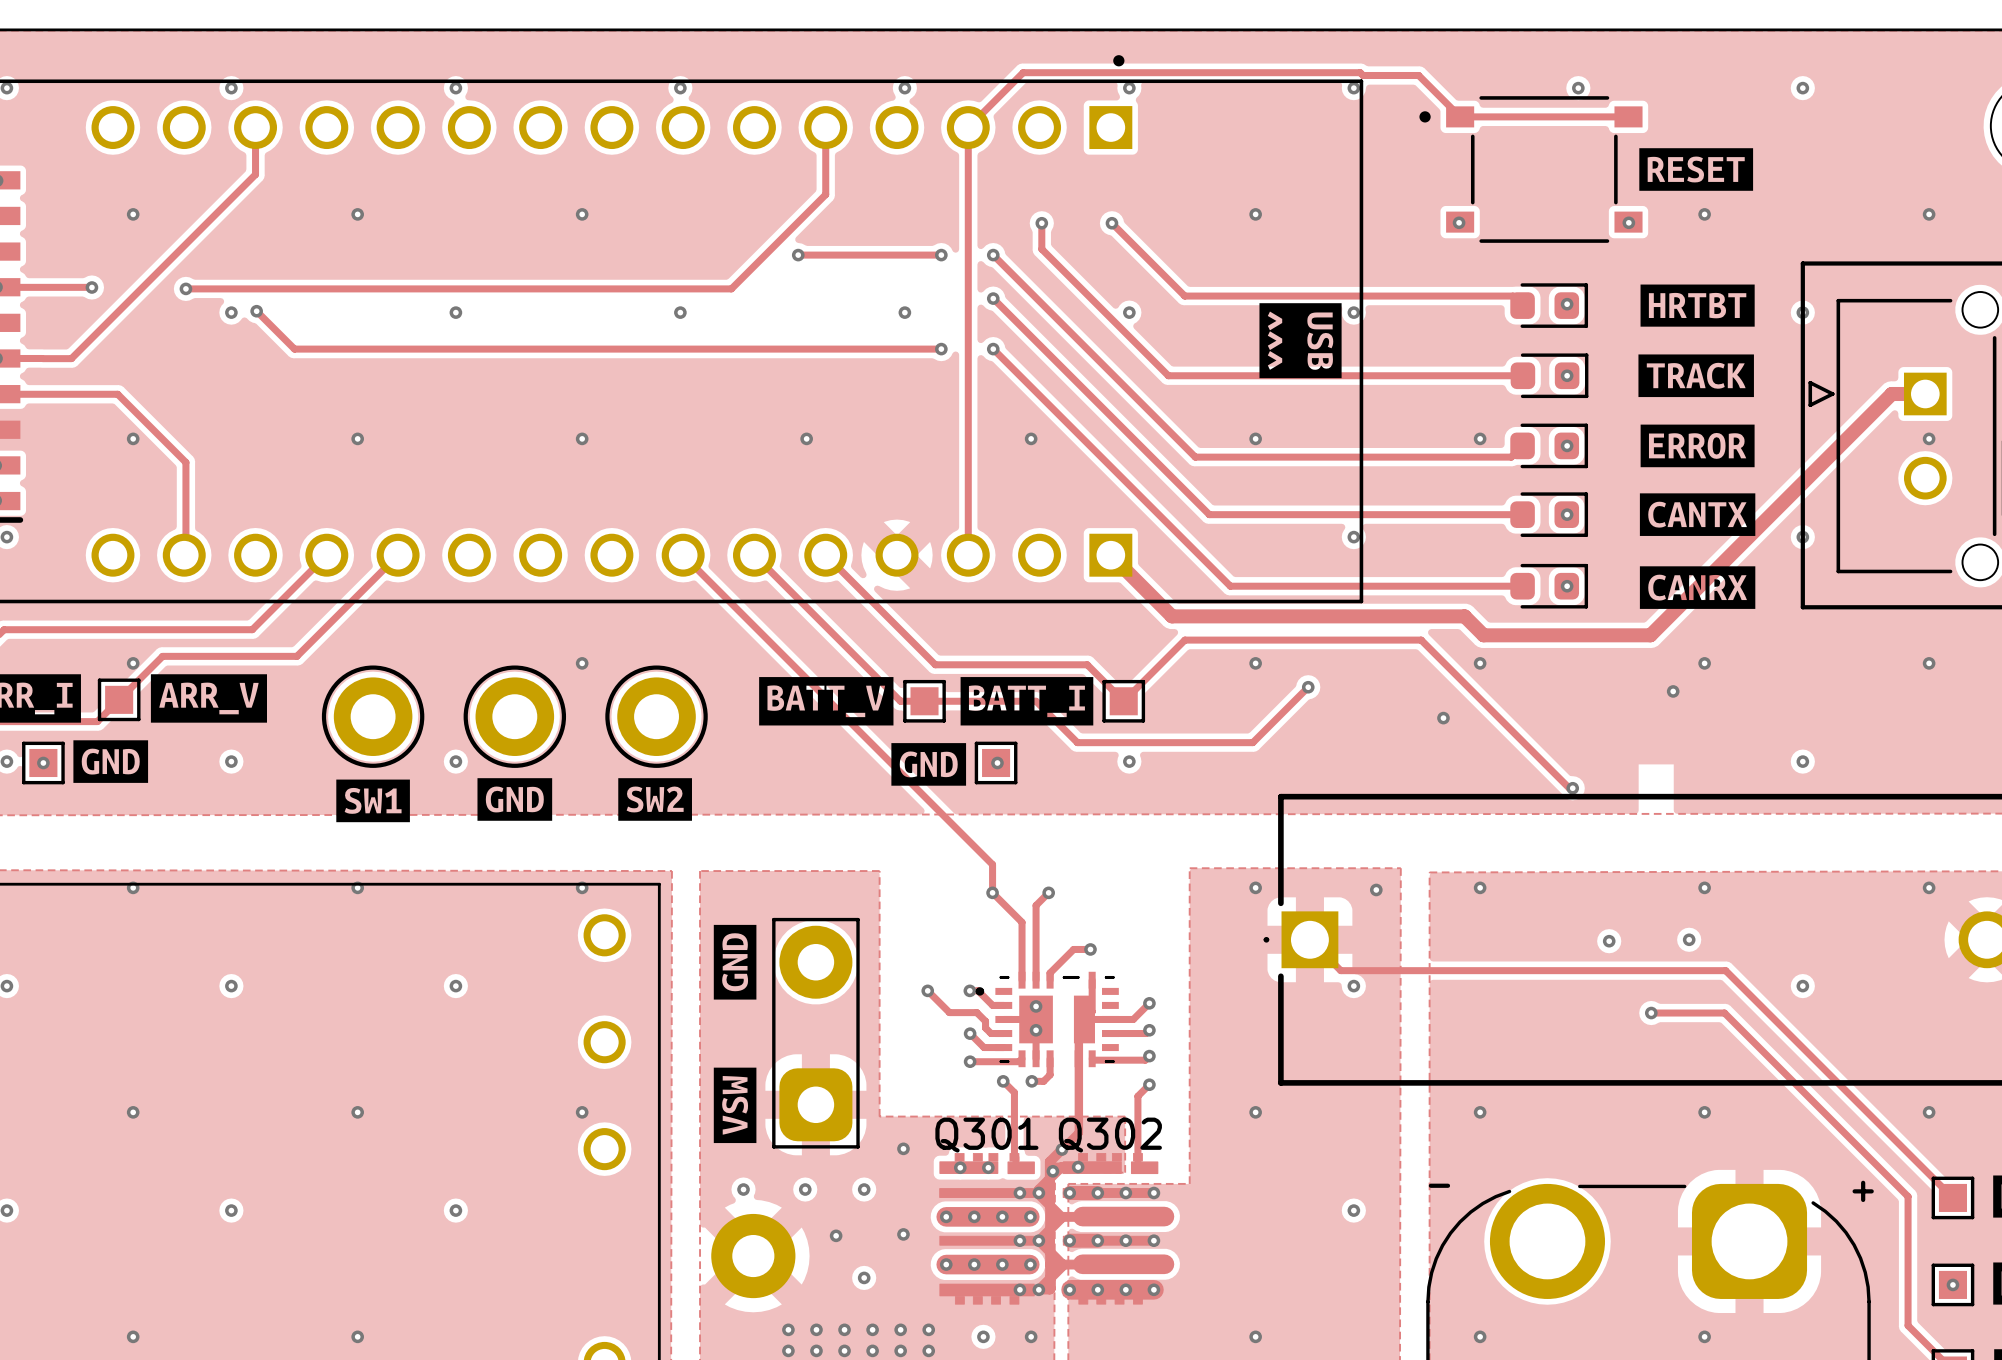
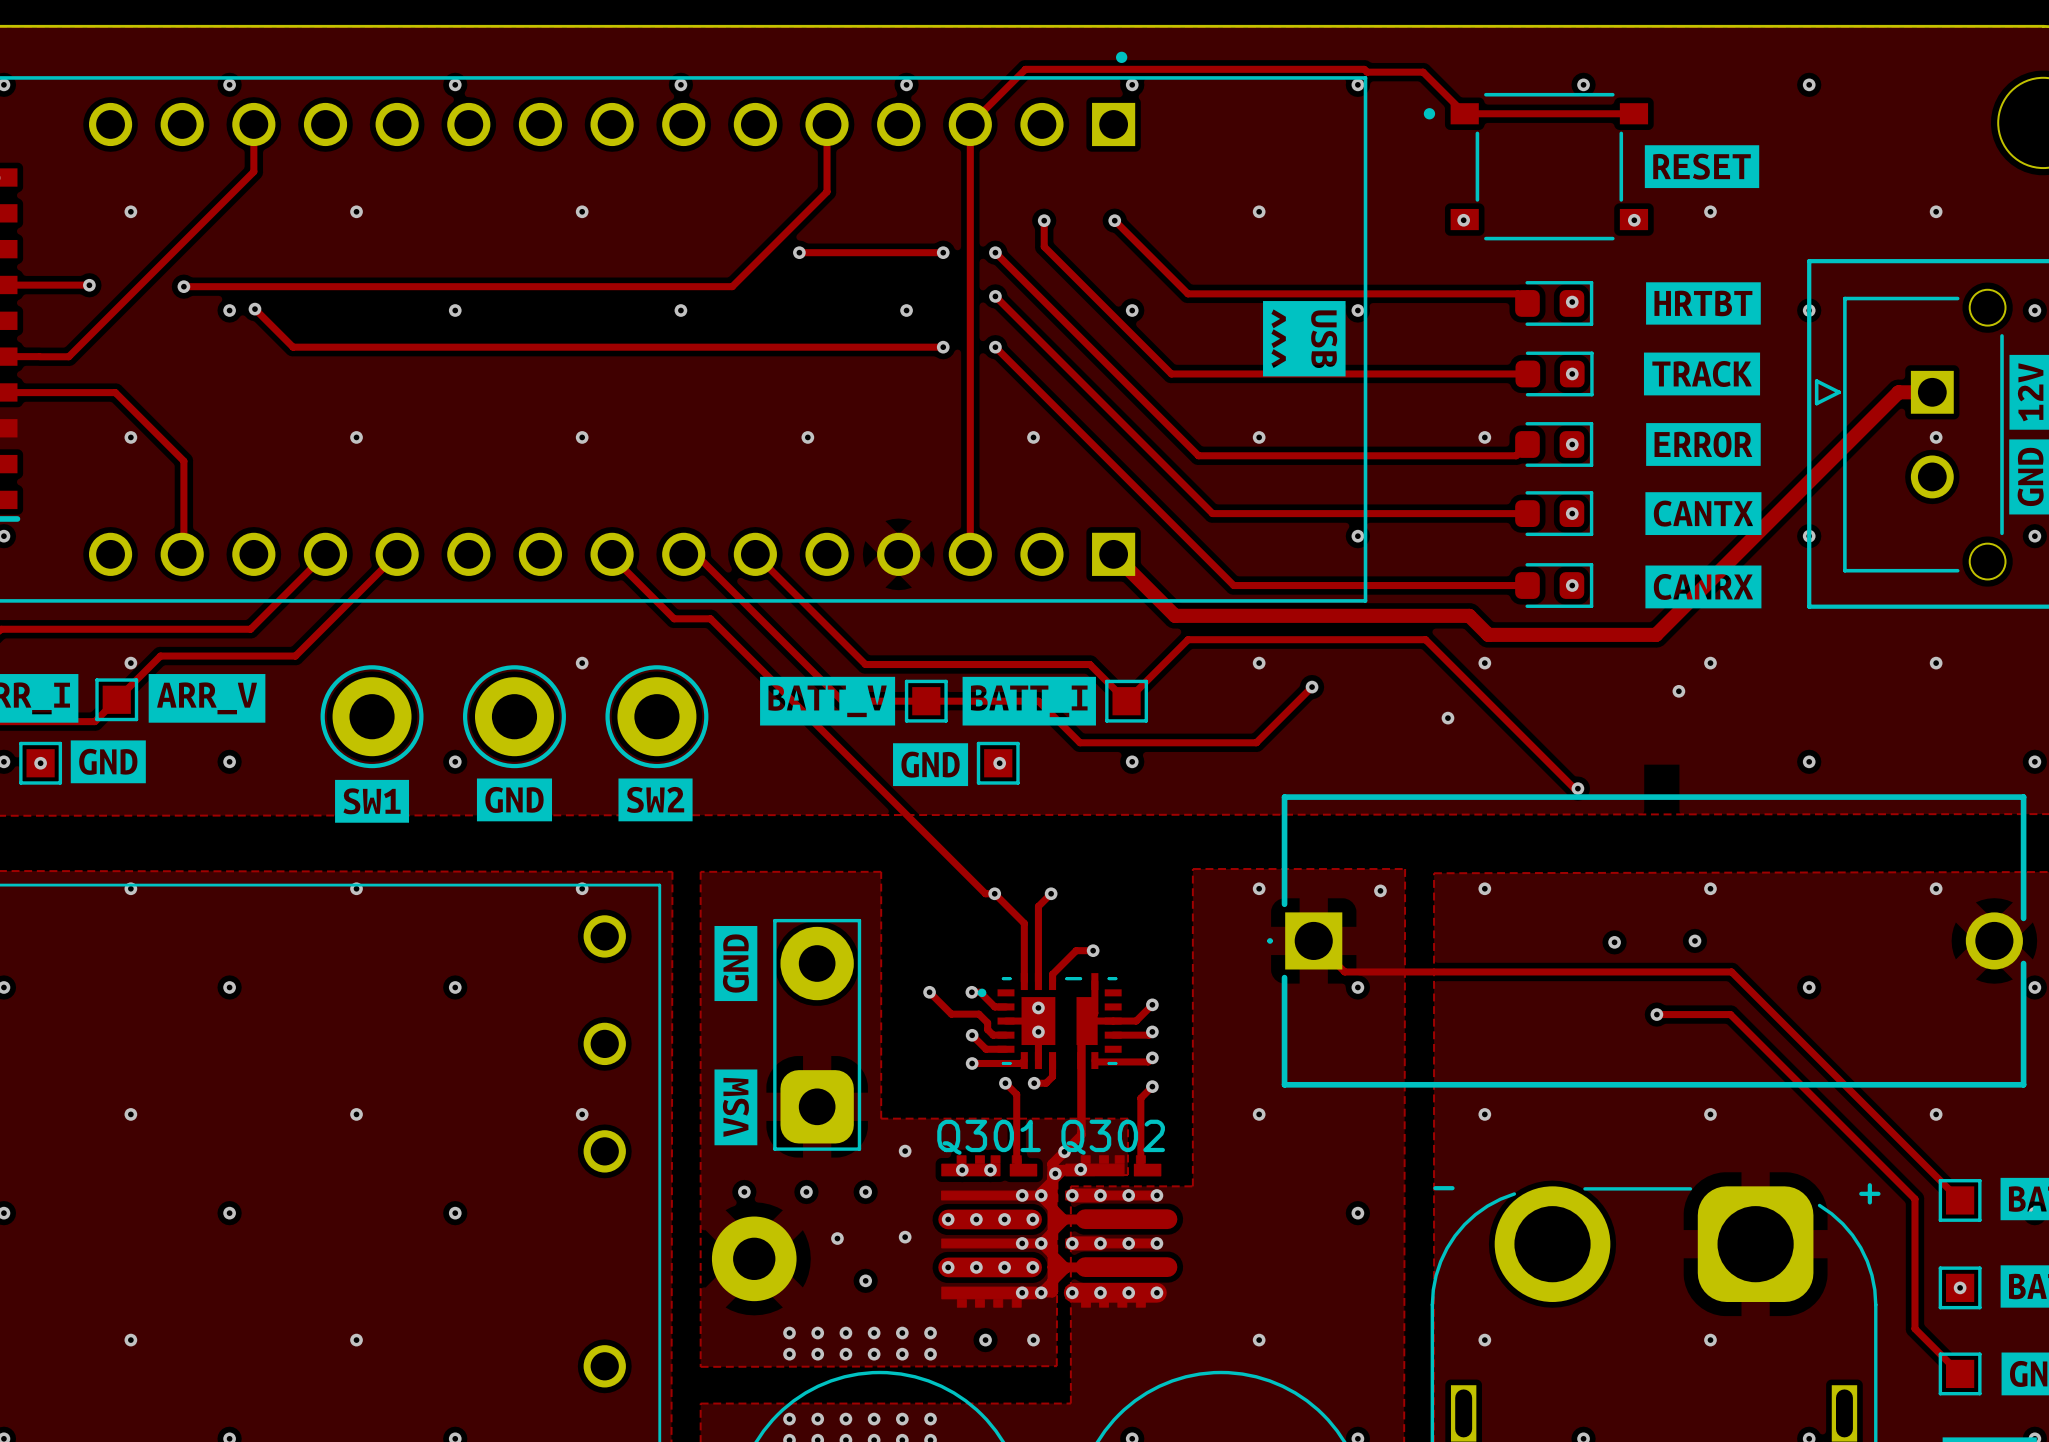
track: (683, 555) (992, 864) (992, 892) -> (612, 554) (612, 556) (674, 618) (710, 618) (985, 893) (994, 893)
track: none -> (683, 554) (695, 554) (842, 701) (902, 701)
track: (825, 555) (935, 664) -> none
track: (864, 664) (900, 701) -> (865, 664) (937, 664)

